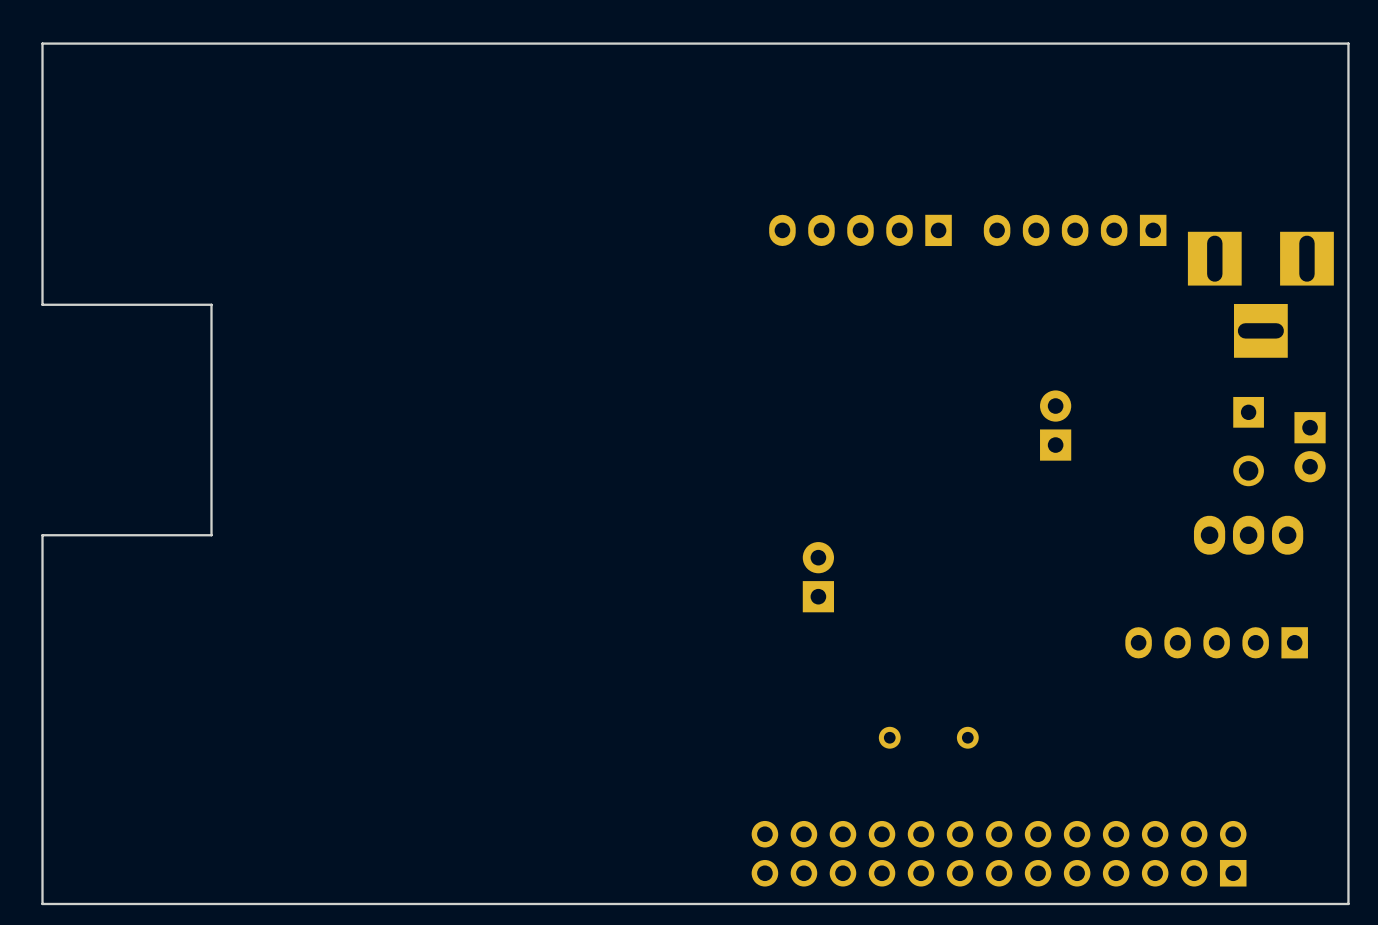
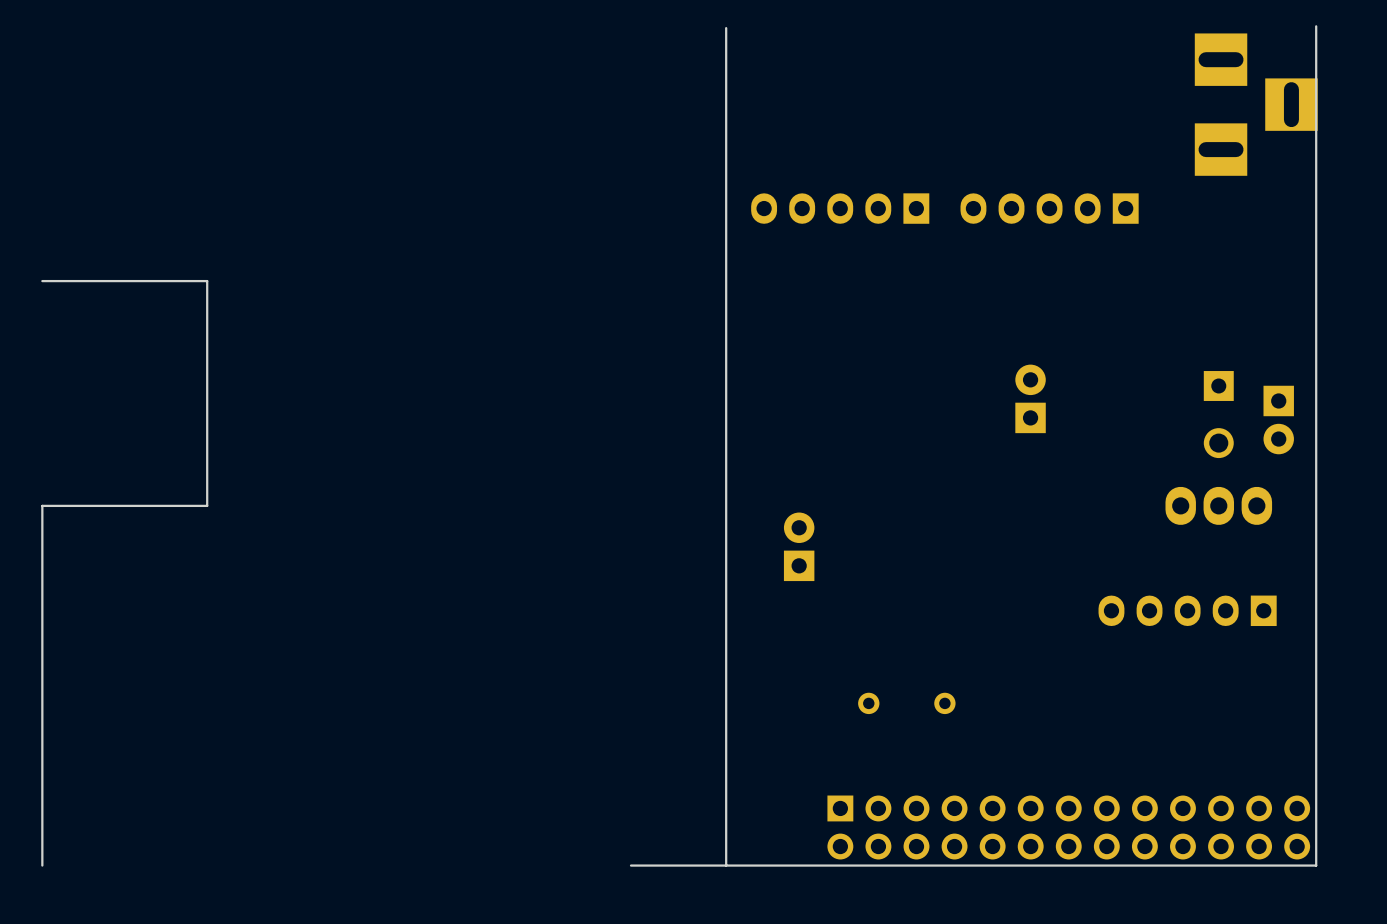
board edge: (1348, 43) (42, 43) (42, 304) -> none
board edge: none -> (726, 28) (726, 865)
part rotation: 0° (1260, 294) -> 90° counterclockwise (1256, 104)
part position: (1260, 294) -> (1256, 104)
part rotation: 0° (999, 853) -> 180° (1068, 827)
board edge: (646, 903) (42, 903) -> none

